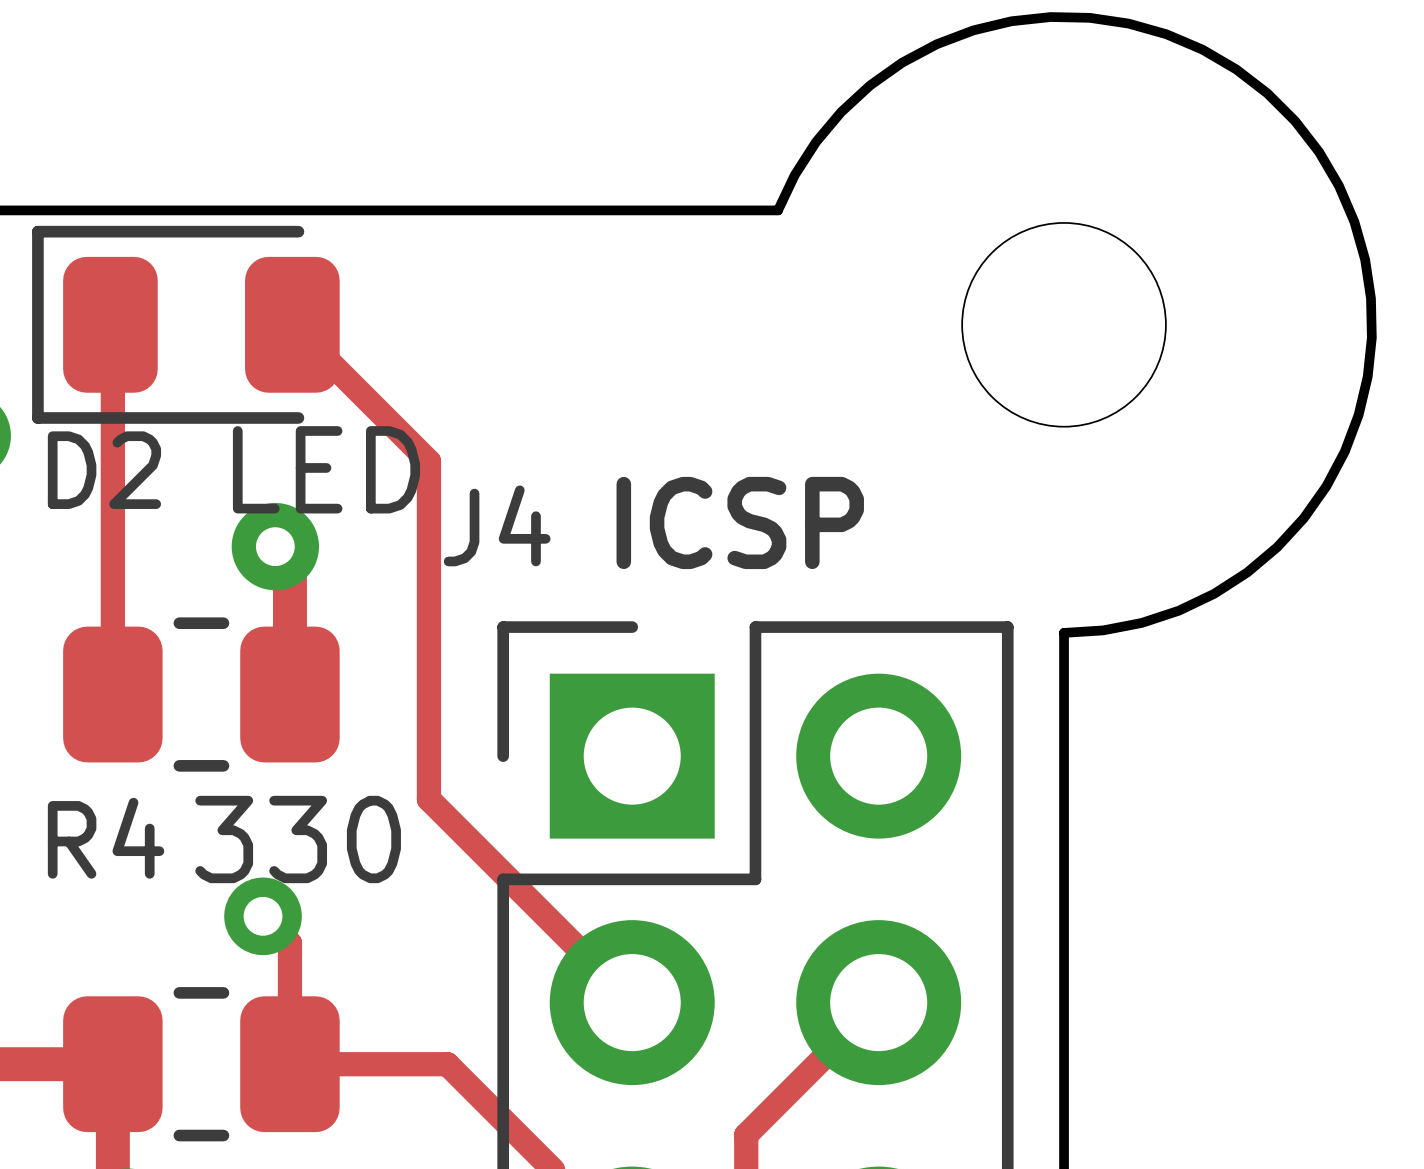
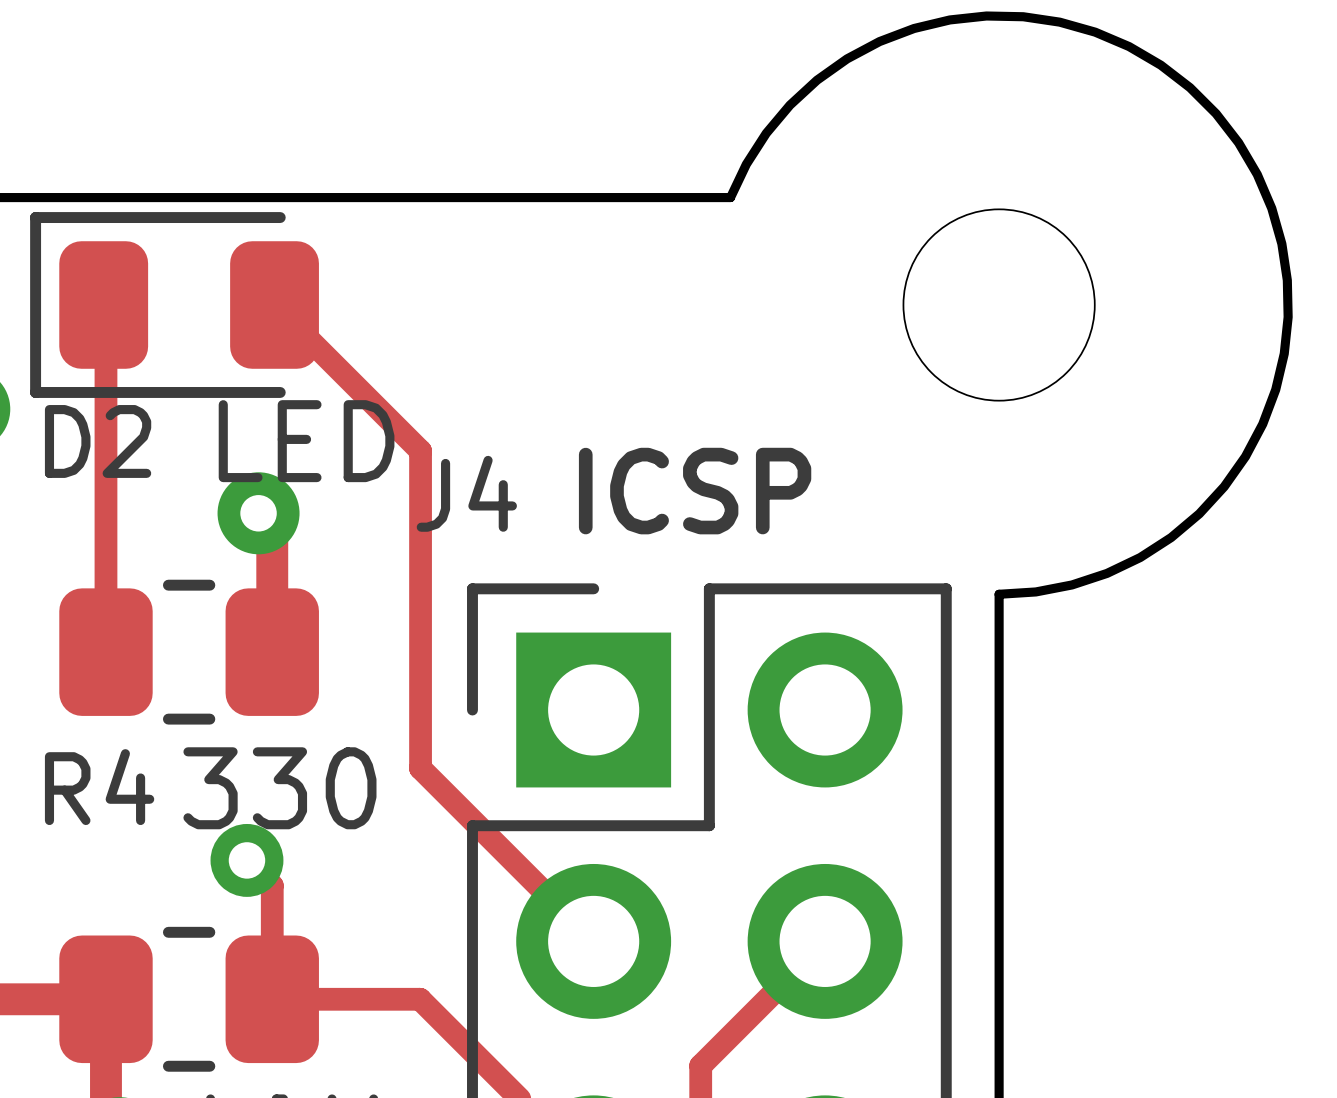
track: (428, 461) (428, 799) (447, 818) -> (402, 433) (420, 451) (420, 768)

